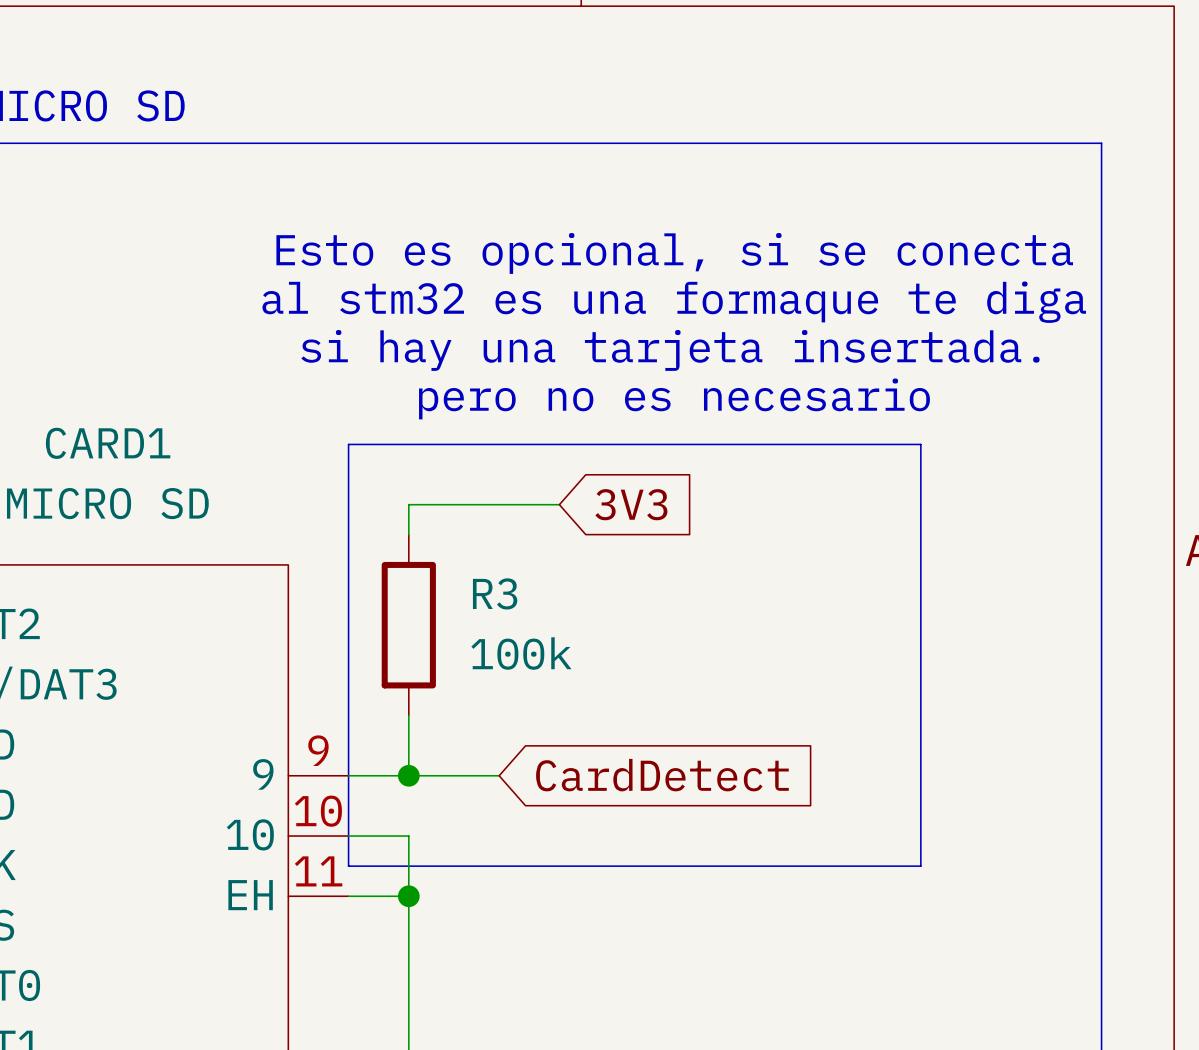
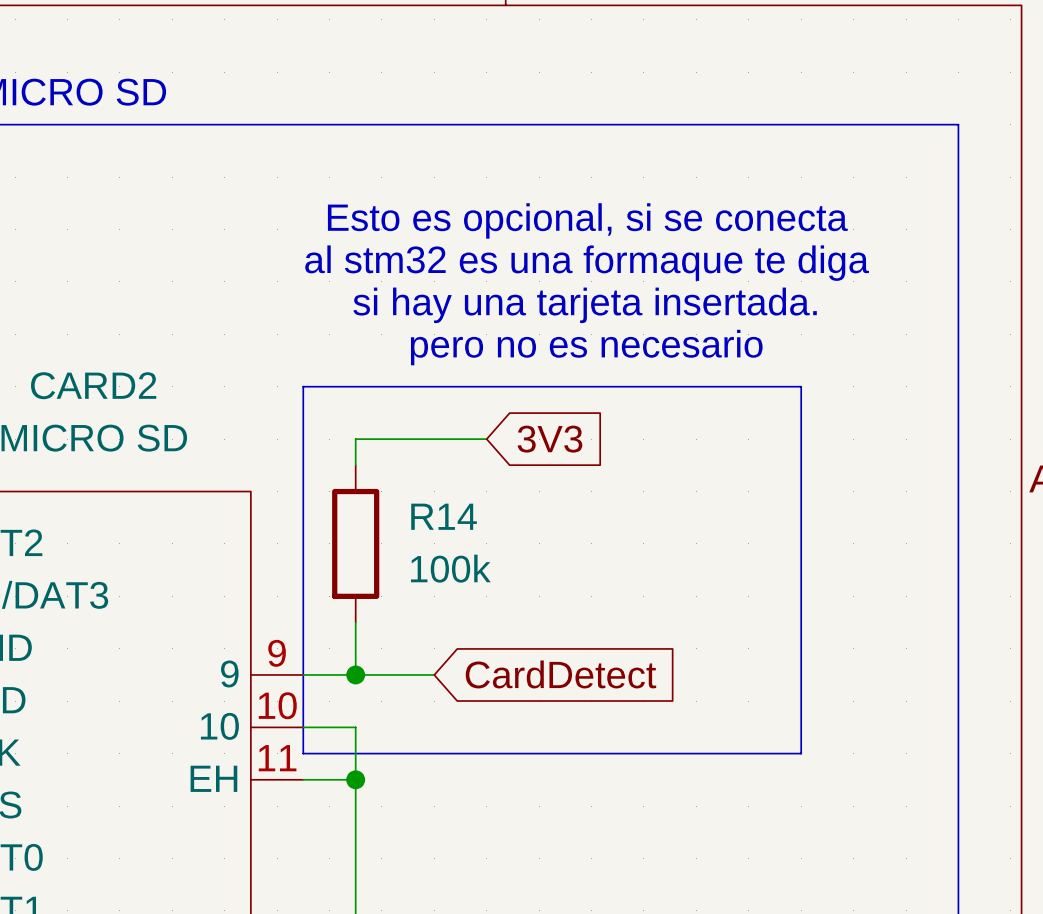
CARD1 name: CARD1 (108, 443) -> CARD2 (93, 385)
R3 name: R3 (495, 593) -> R14 (444, 516)

